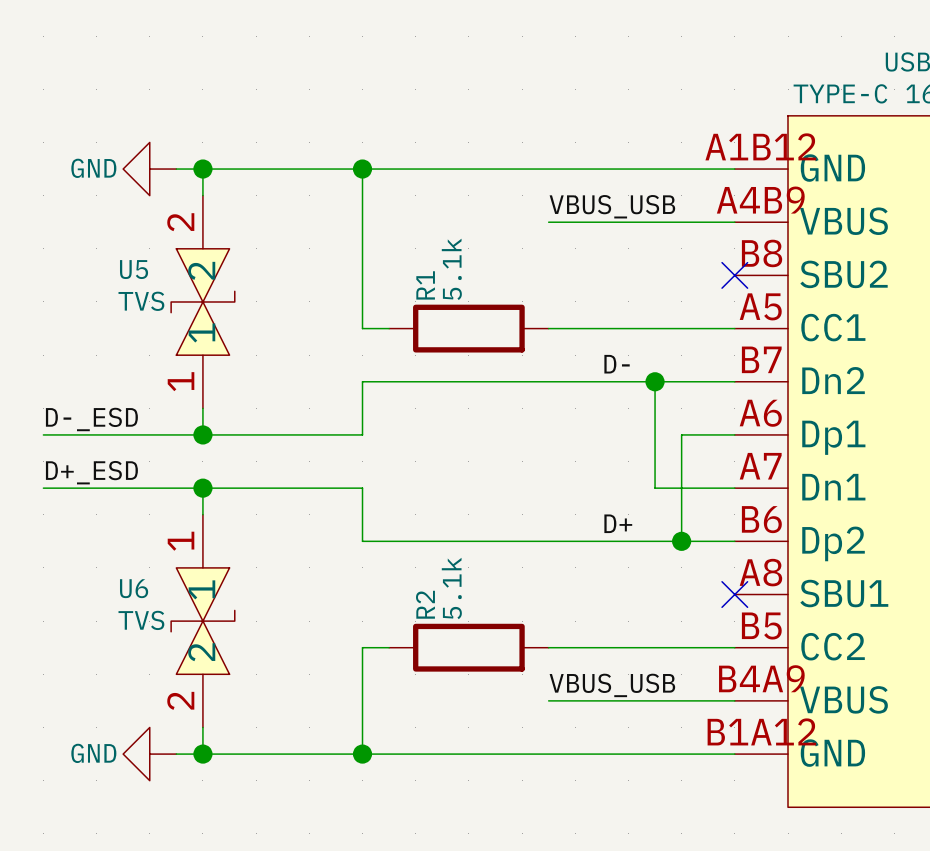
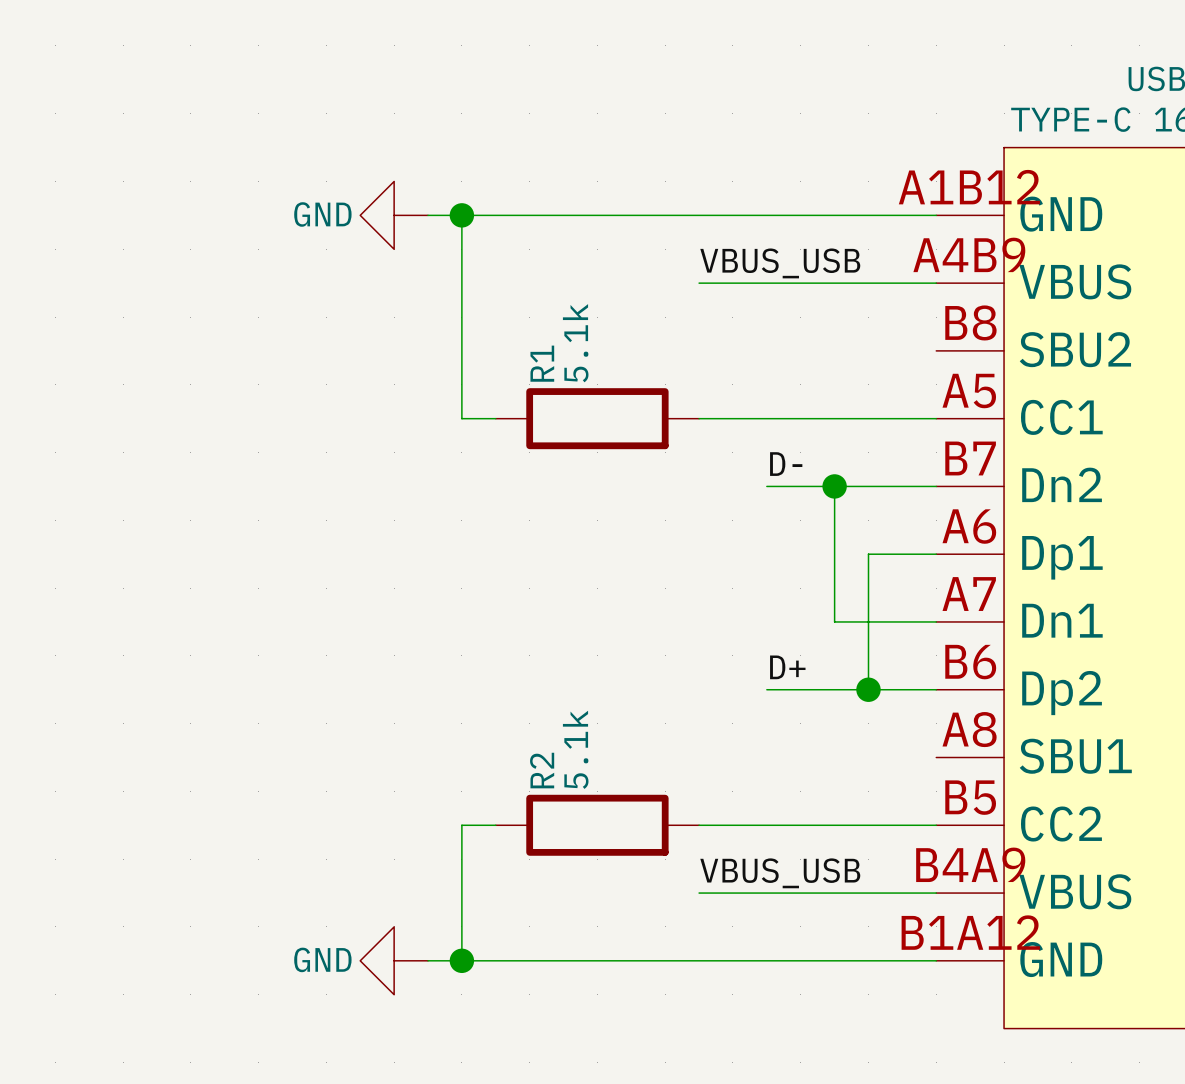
power symbol position: GND (149, 169) -> GND (394, 215)
wire: (176, 169) (335, 169) -> none
wire: (202, 169) (202, 195) -> none
junction: (202, 169) -> none
no-connect mark: (734, 275) -> none
U5: TVS (202, 301) -> none
wire: (601, 381) (362, 381) (362, 434) (43, 434) -> none
wire: (202, 408) (202, 434) -> none
label: D-_ESD (91, 419) -> none
junction: (202, 434) -> none
label: D+_ESD (91, 472) -> none
wire: (43, 488) (362, 488) (362, 541) (601, 541) -> none
wire: (202, 488) (202, 514) -> none
junction: (202, 488) -> none
no-connect mark: (734, 594) -> none
U6: TVS (202, 621) -> none
wire: (202, 727) (202, 754) -> none
power symbol position: GND (149, 754) -> GND (394, 960)
wire: (176, 754) (335, 754) -> none
junction: (202, 754) -> none

